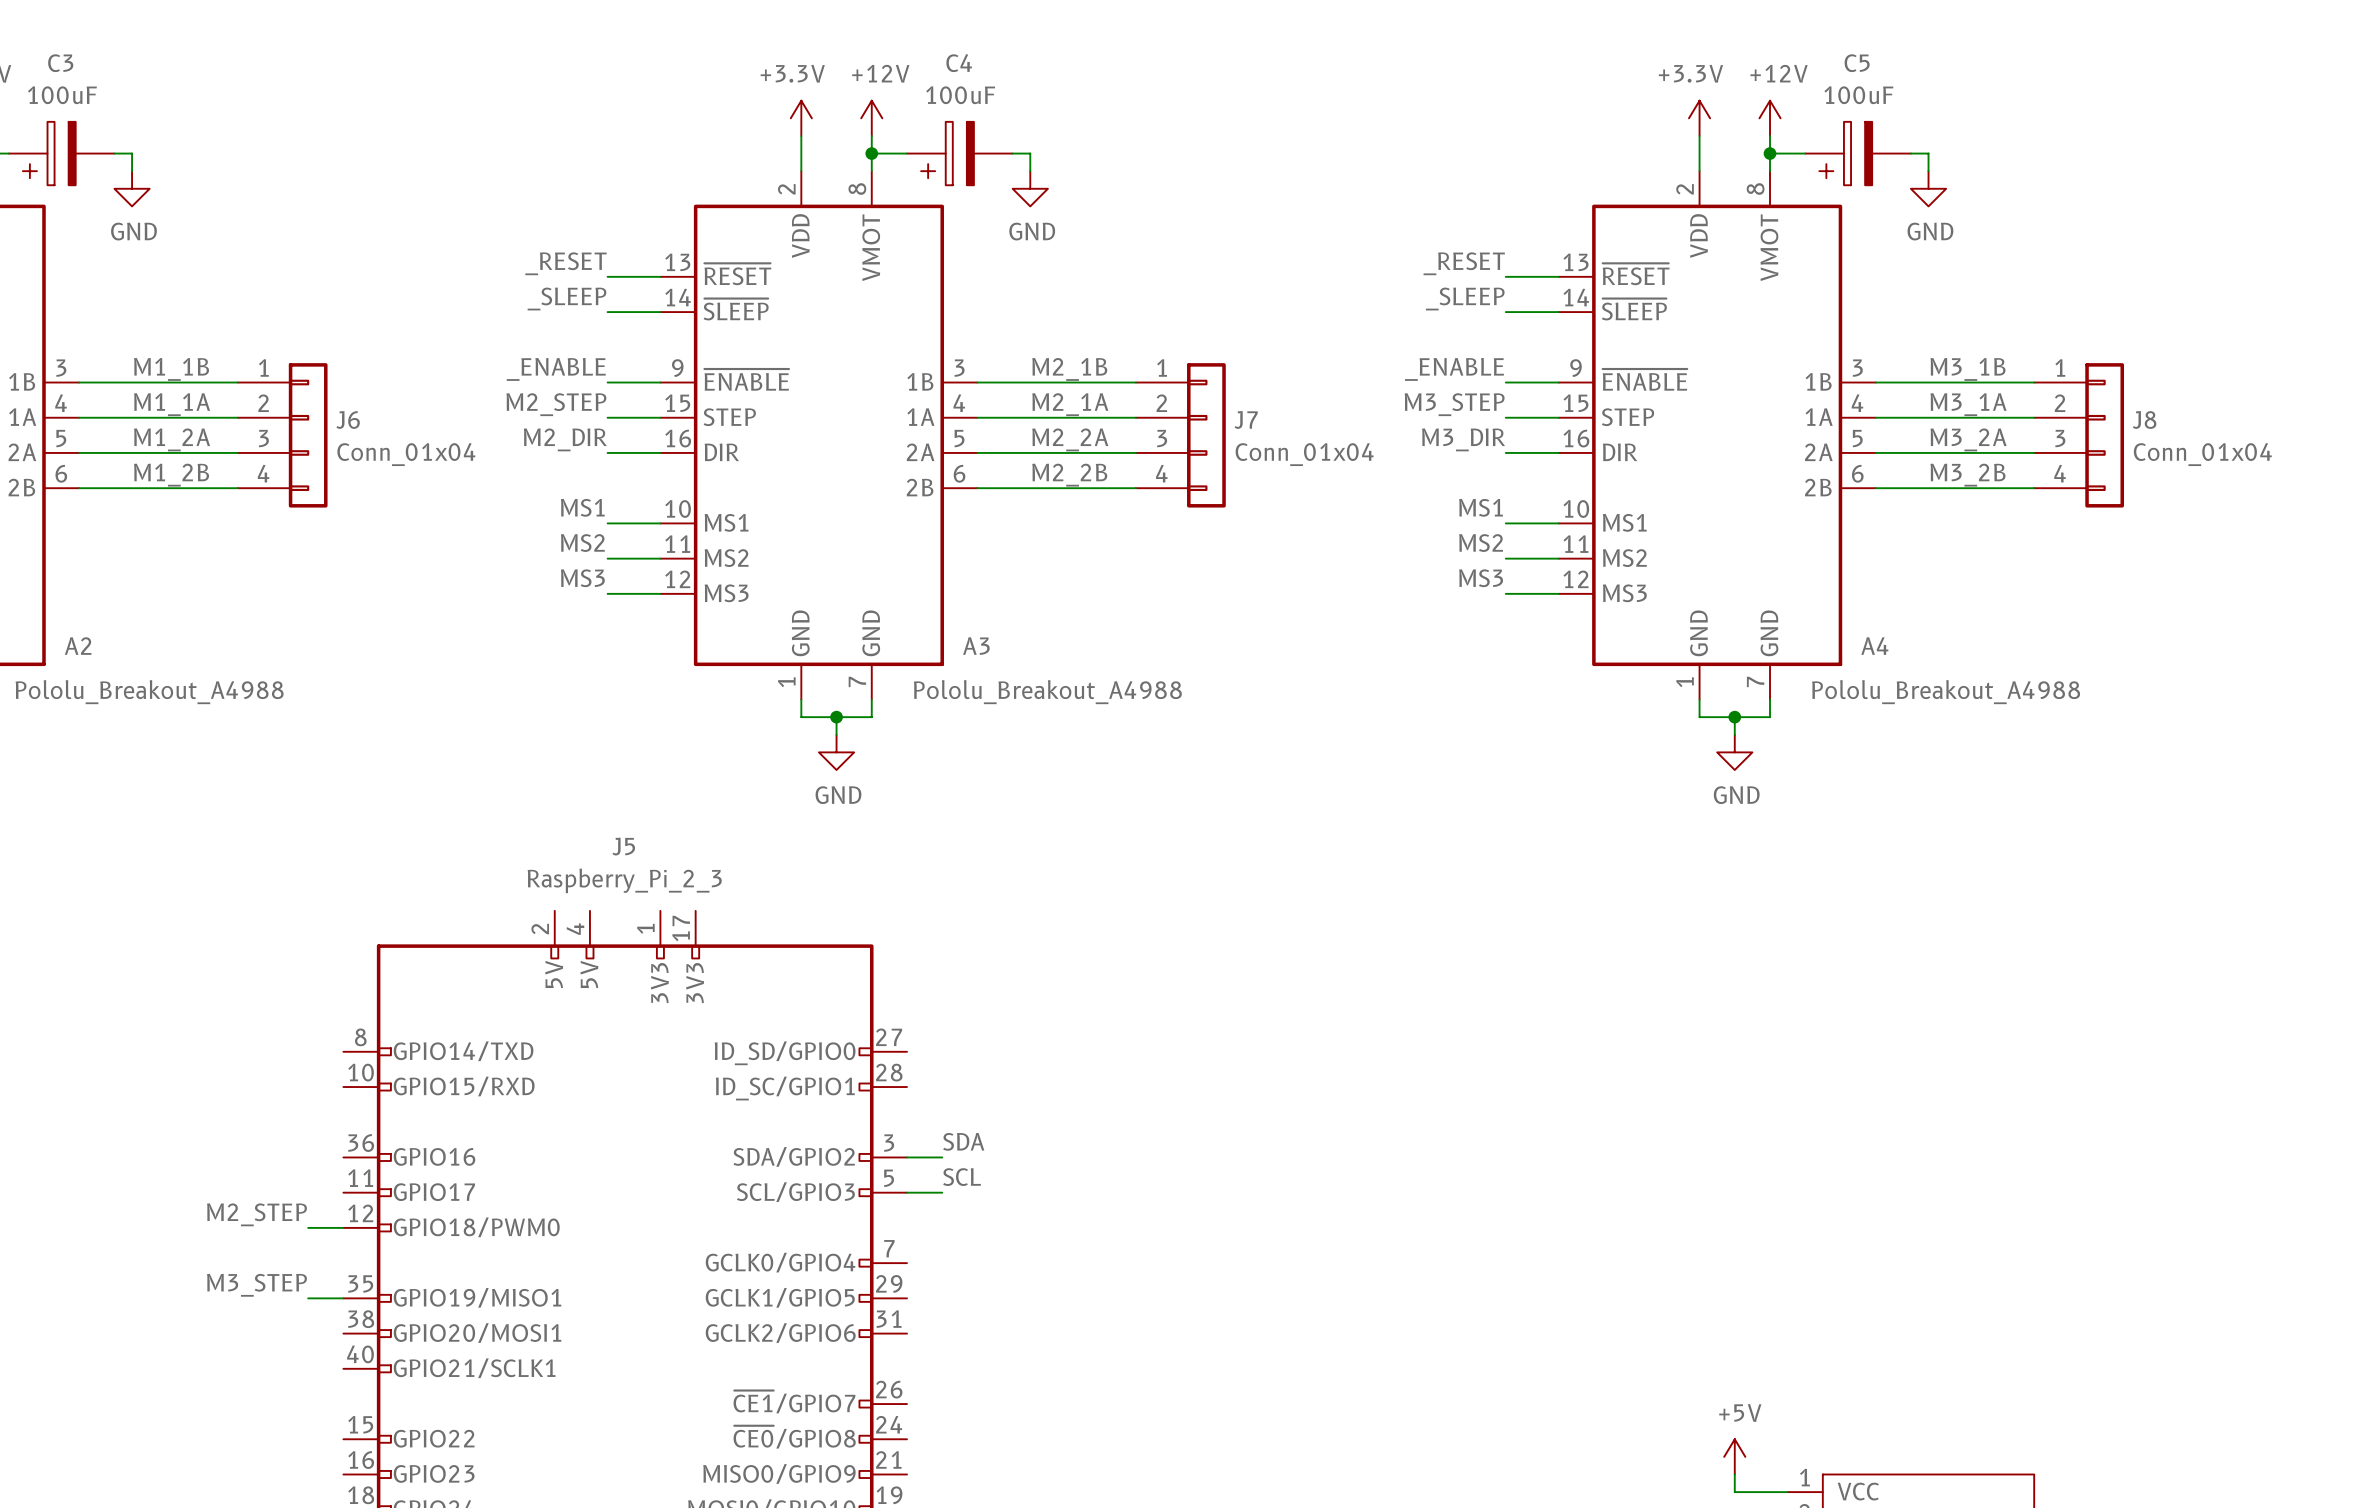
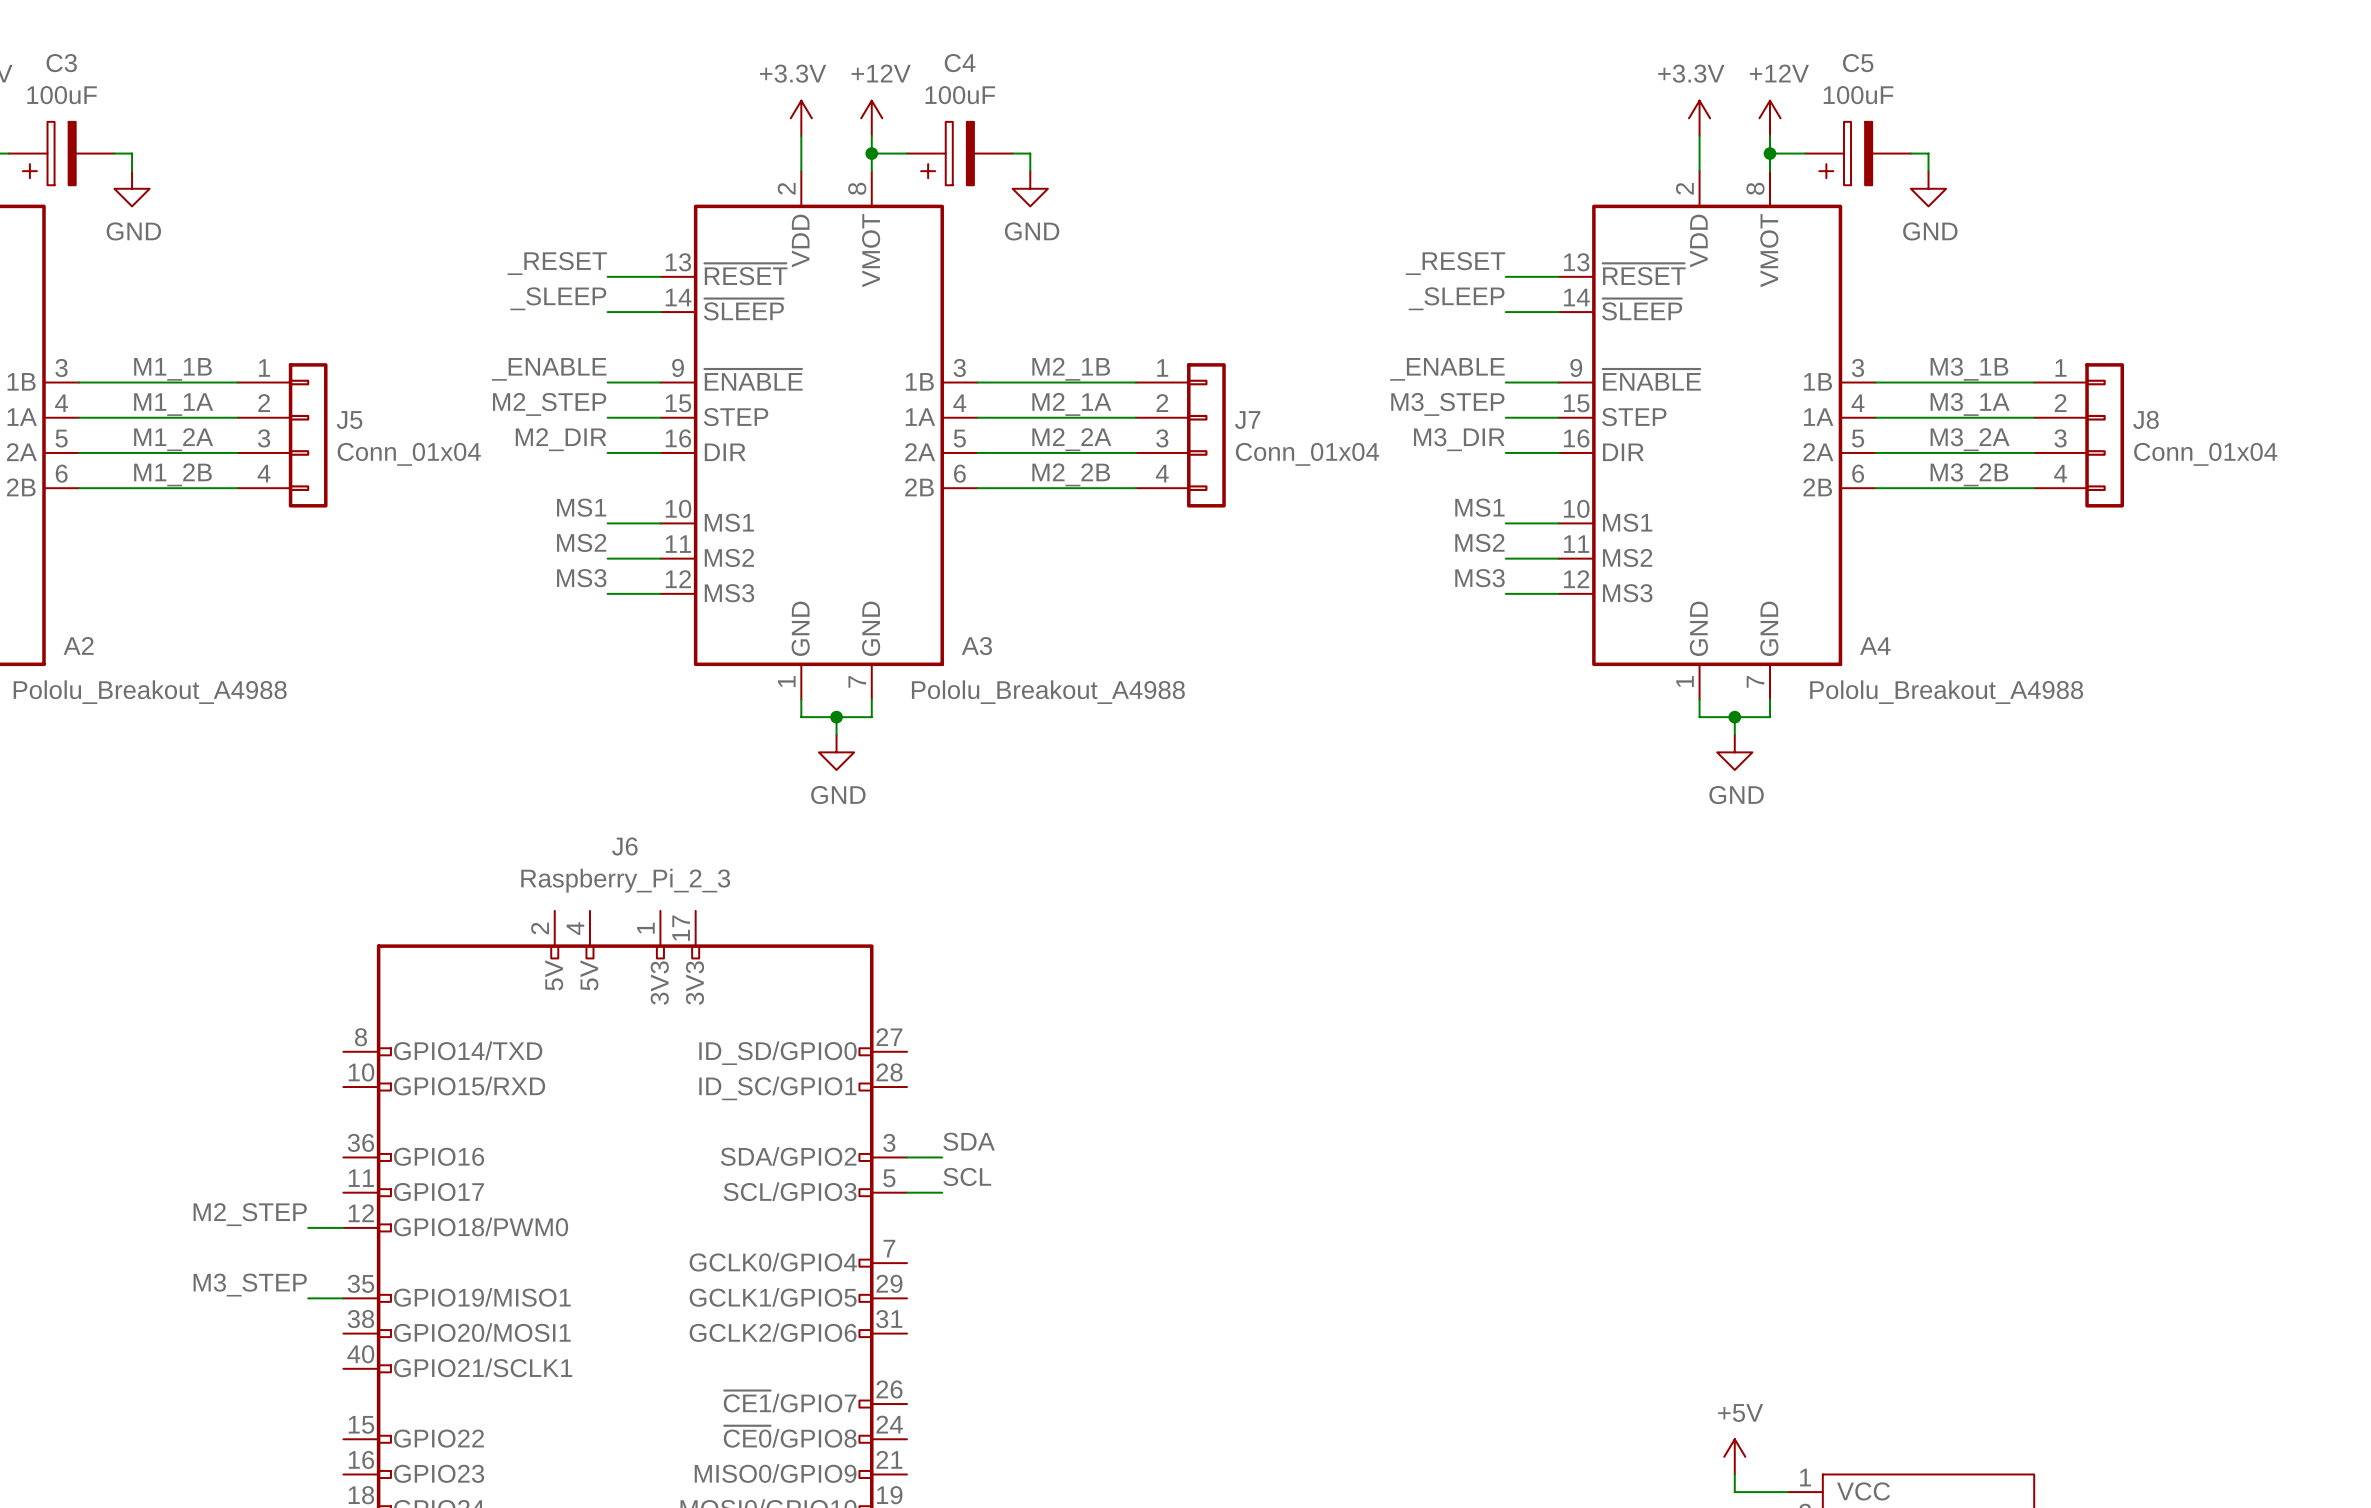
J6 name: J6 (348, 420) -> J5 (349, 420)
J5 name: J5 (623, 846) -> J6 (624, 846)

